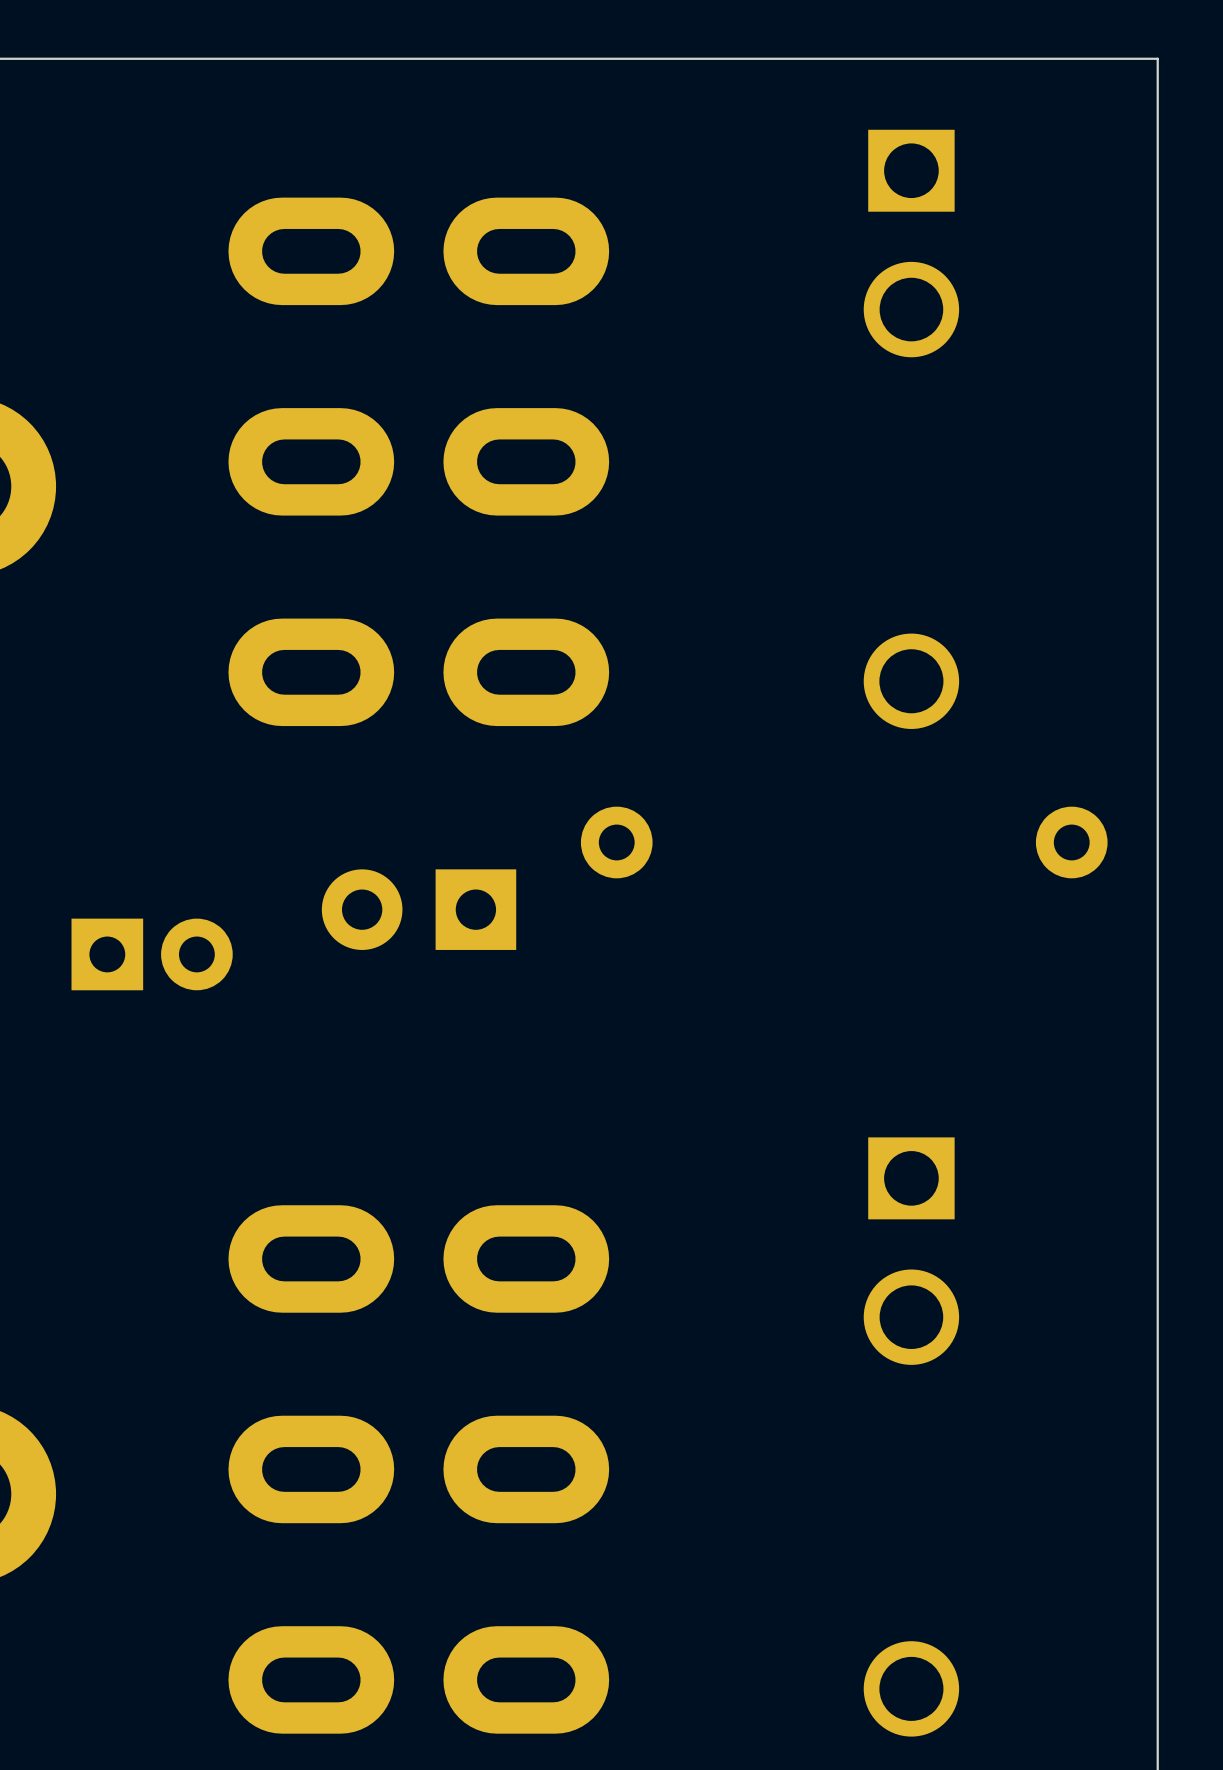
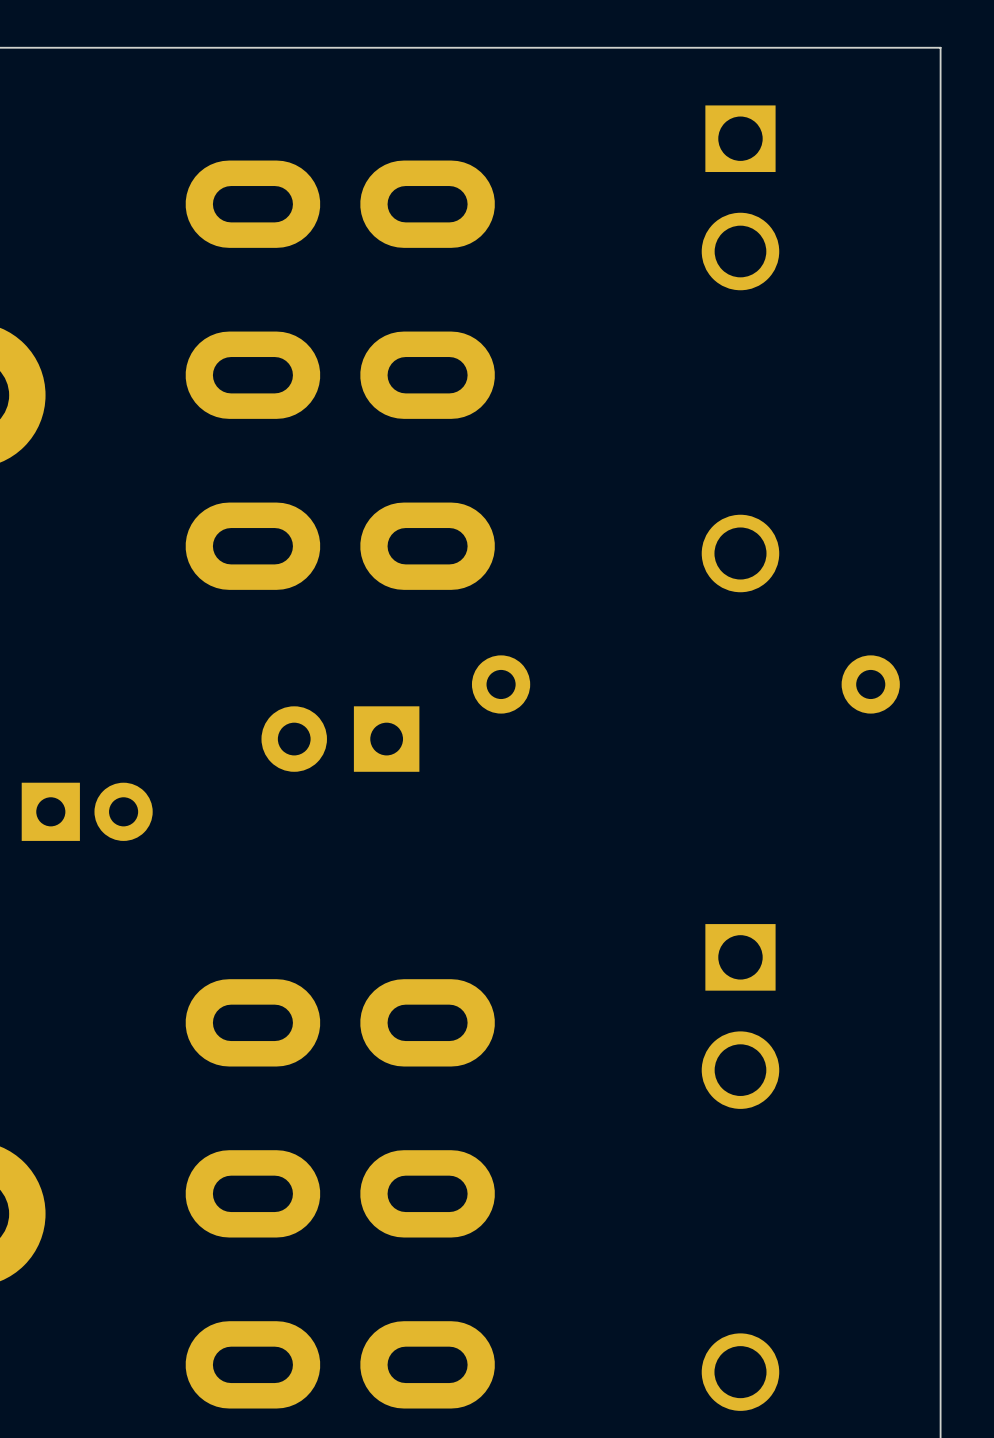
part position: (152, 954) -> (87, 811)

